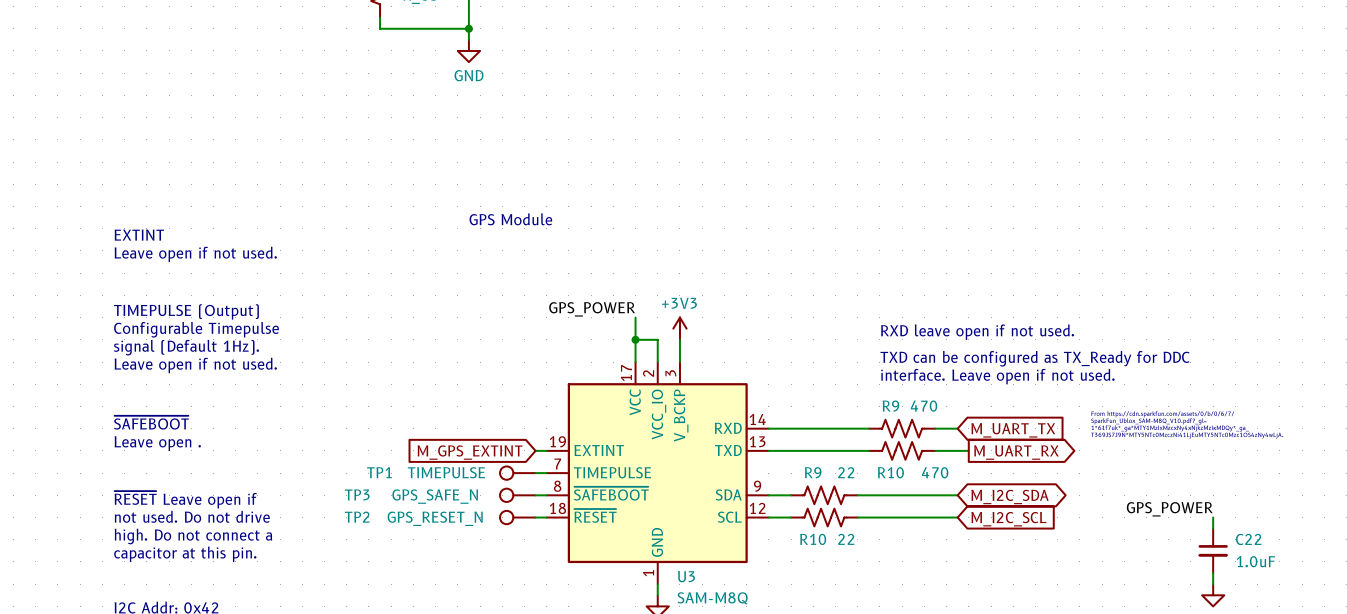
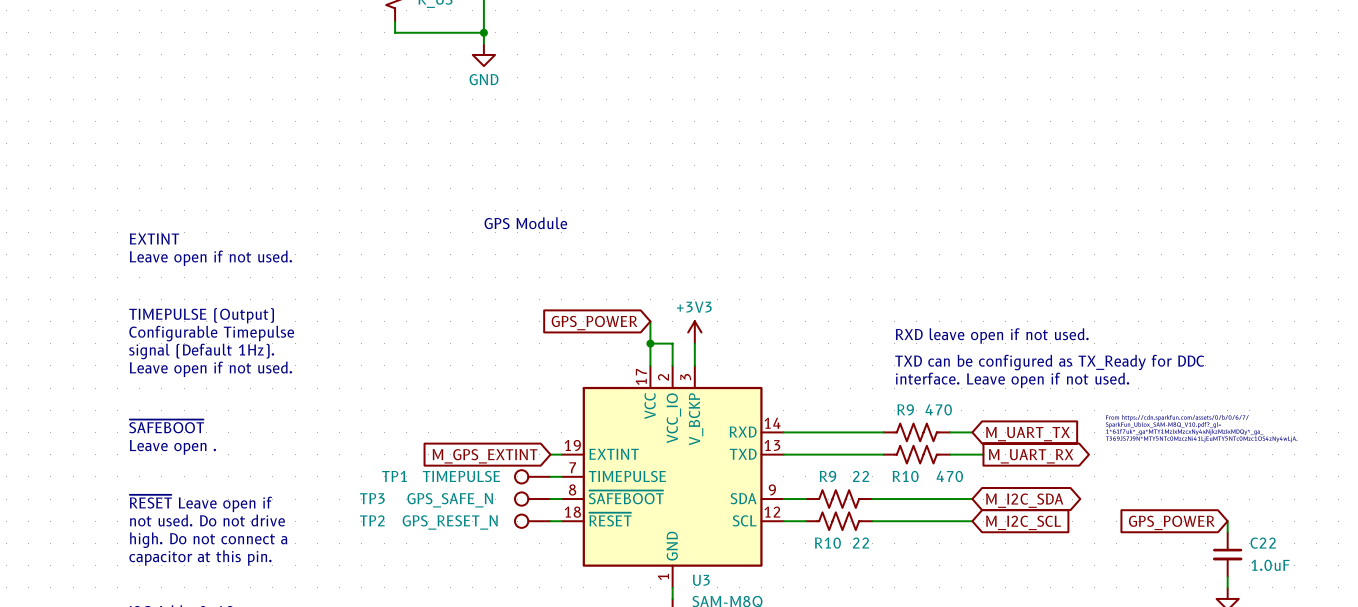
label: GPS_POWER (592, 309) -> none
global label: none -> GPS_POWER (594, 323)
label: GPS_POWER (1169, 509) -> none
global label: none -> GPS_POWER (1171, 522)

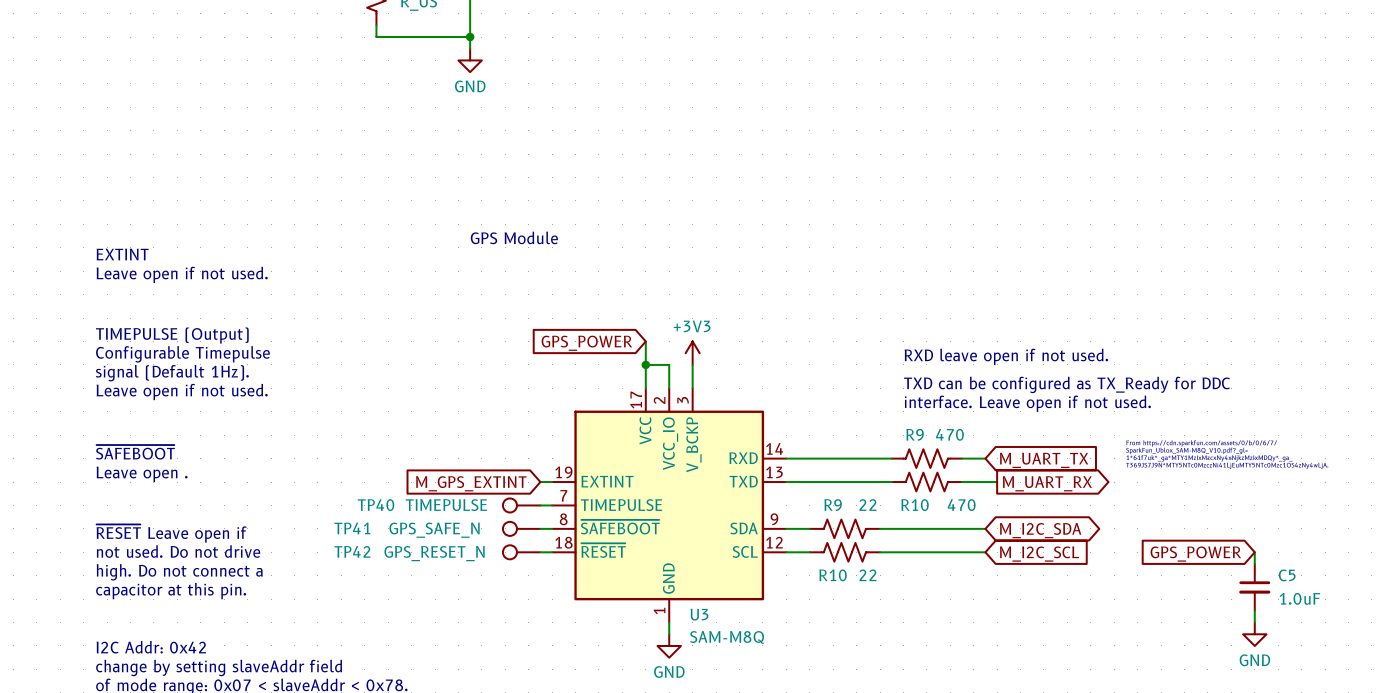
TP1 name: TP1 (394, 476) -> TP40 (376, 505)
TP3 name: TP3 (372, 498) -> TP41 (352, 528)
TP2 name: TP2 (372, 520) -> TP42 (352, 551)
C22 name: C22 (1263, 543) -> C5 (1287, 575)

